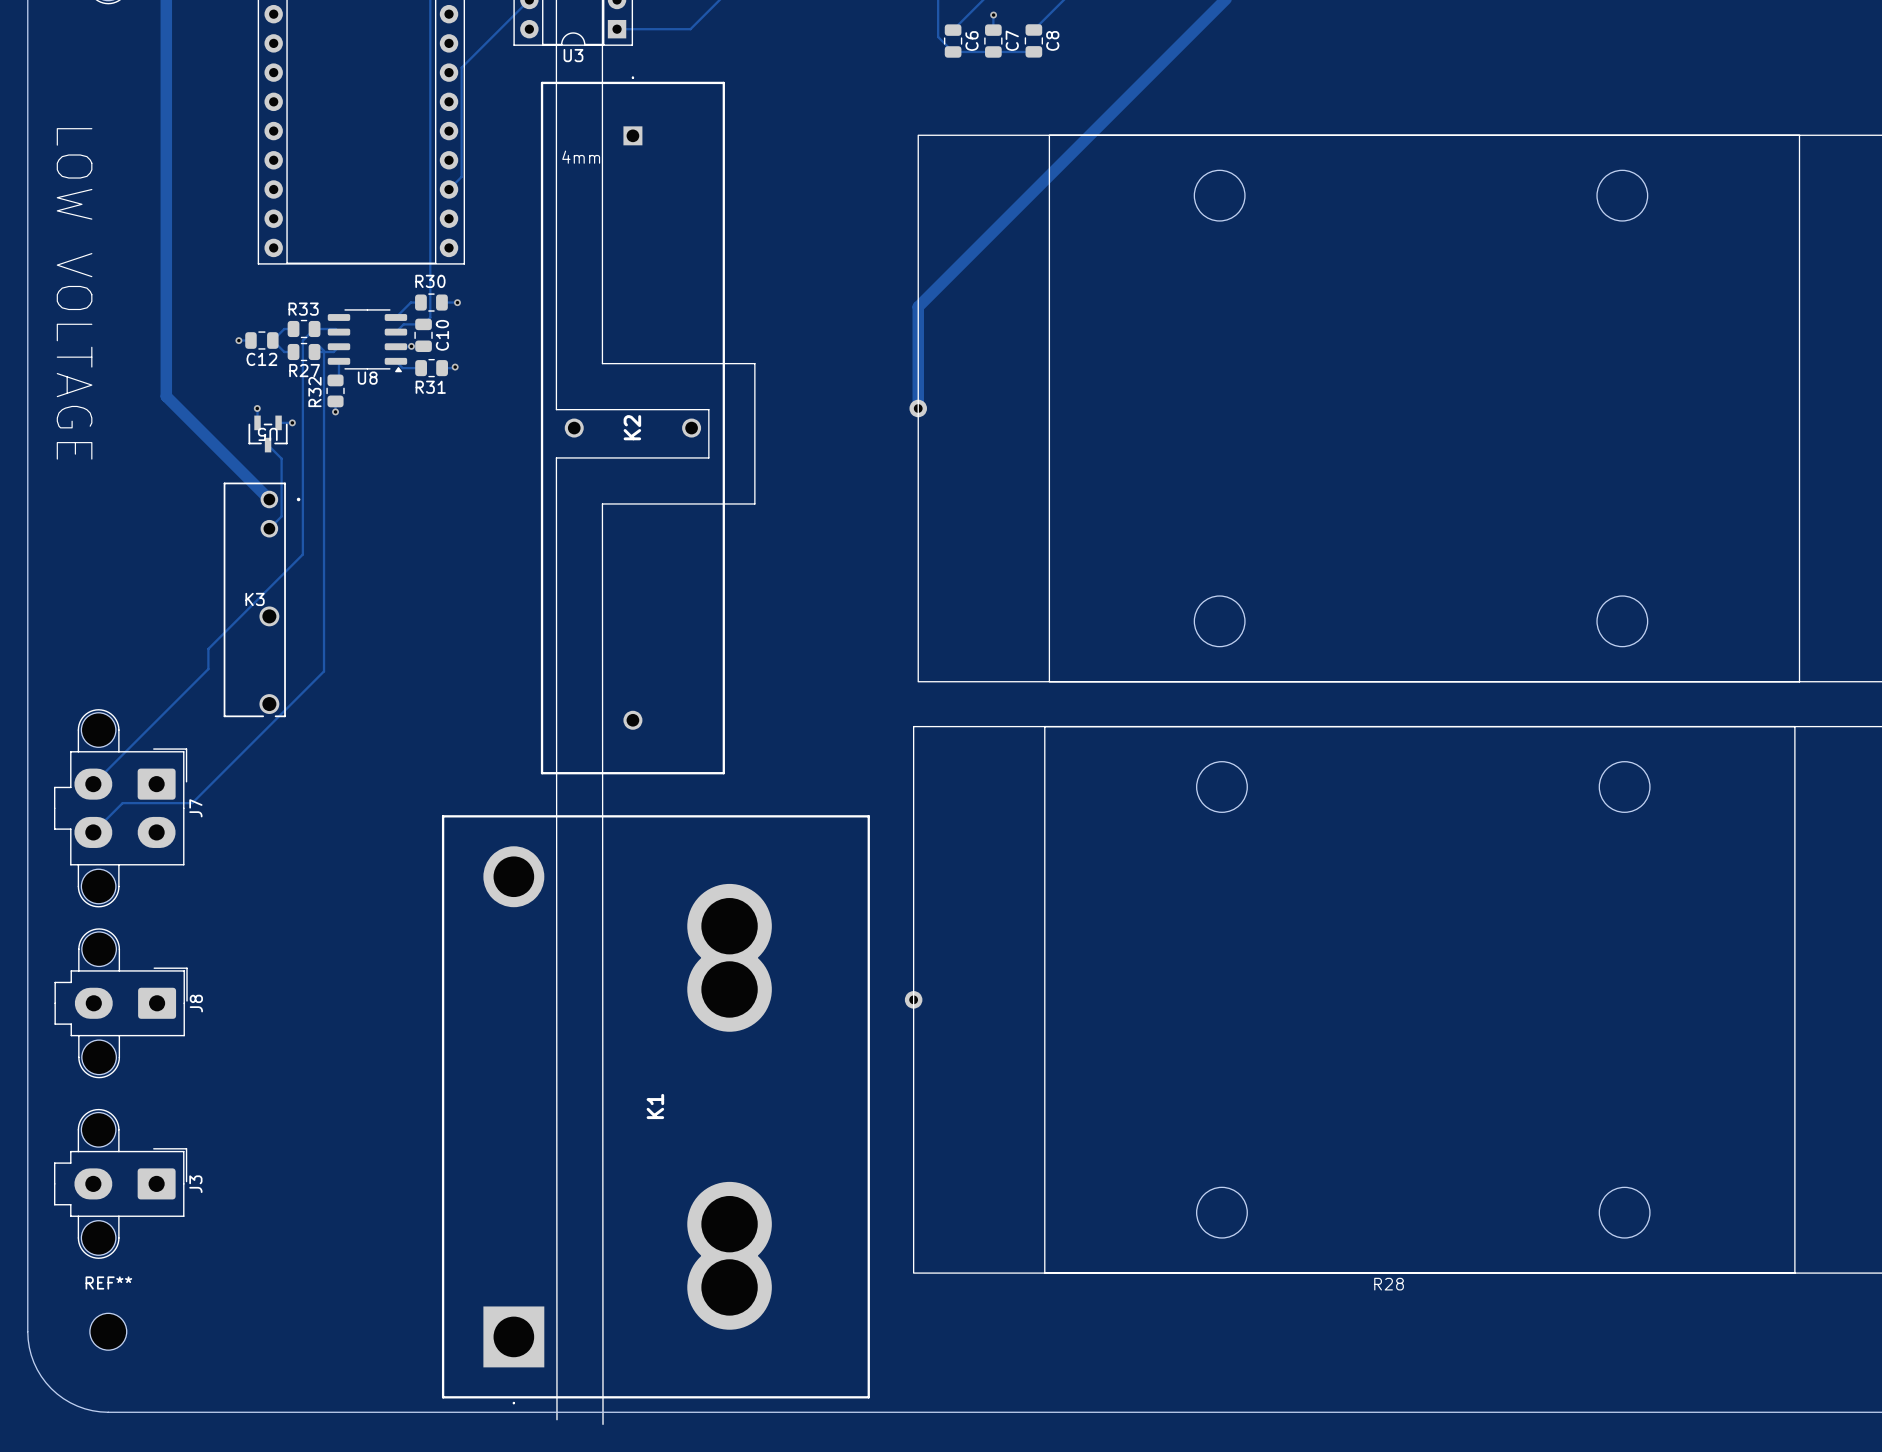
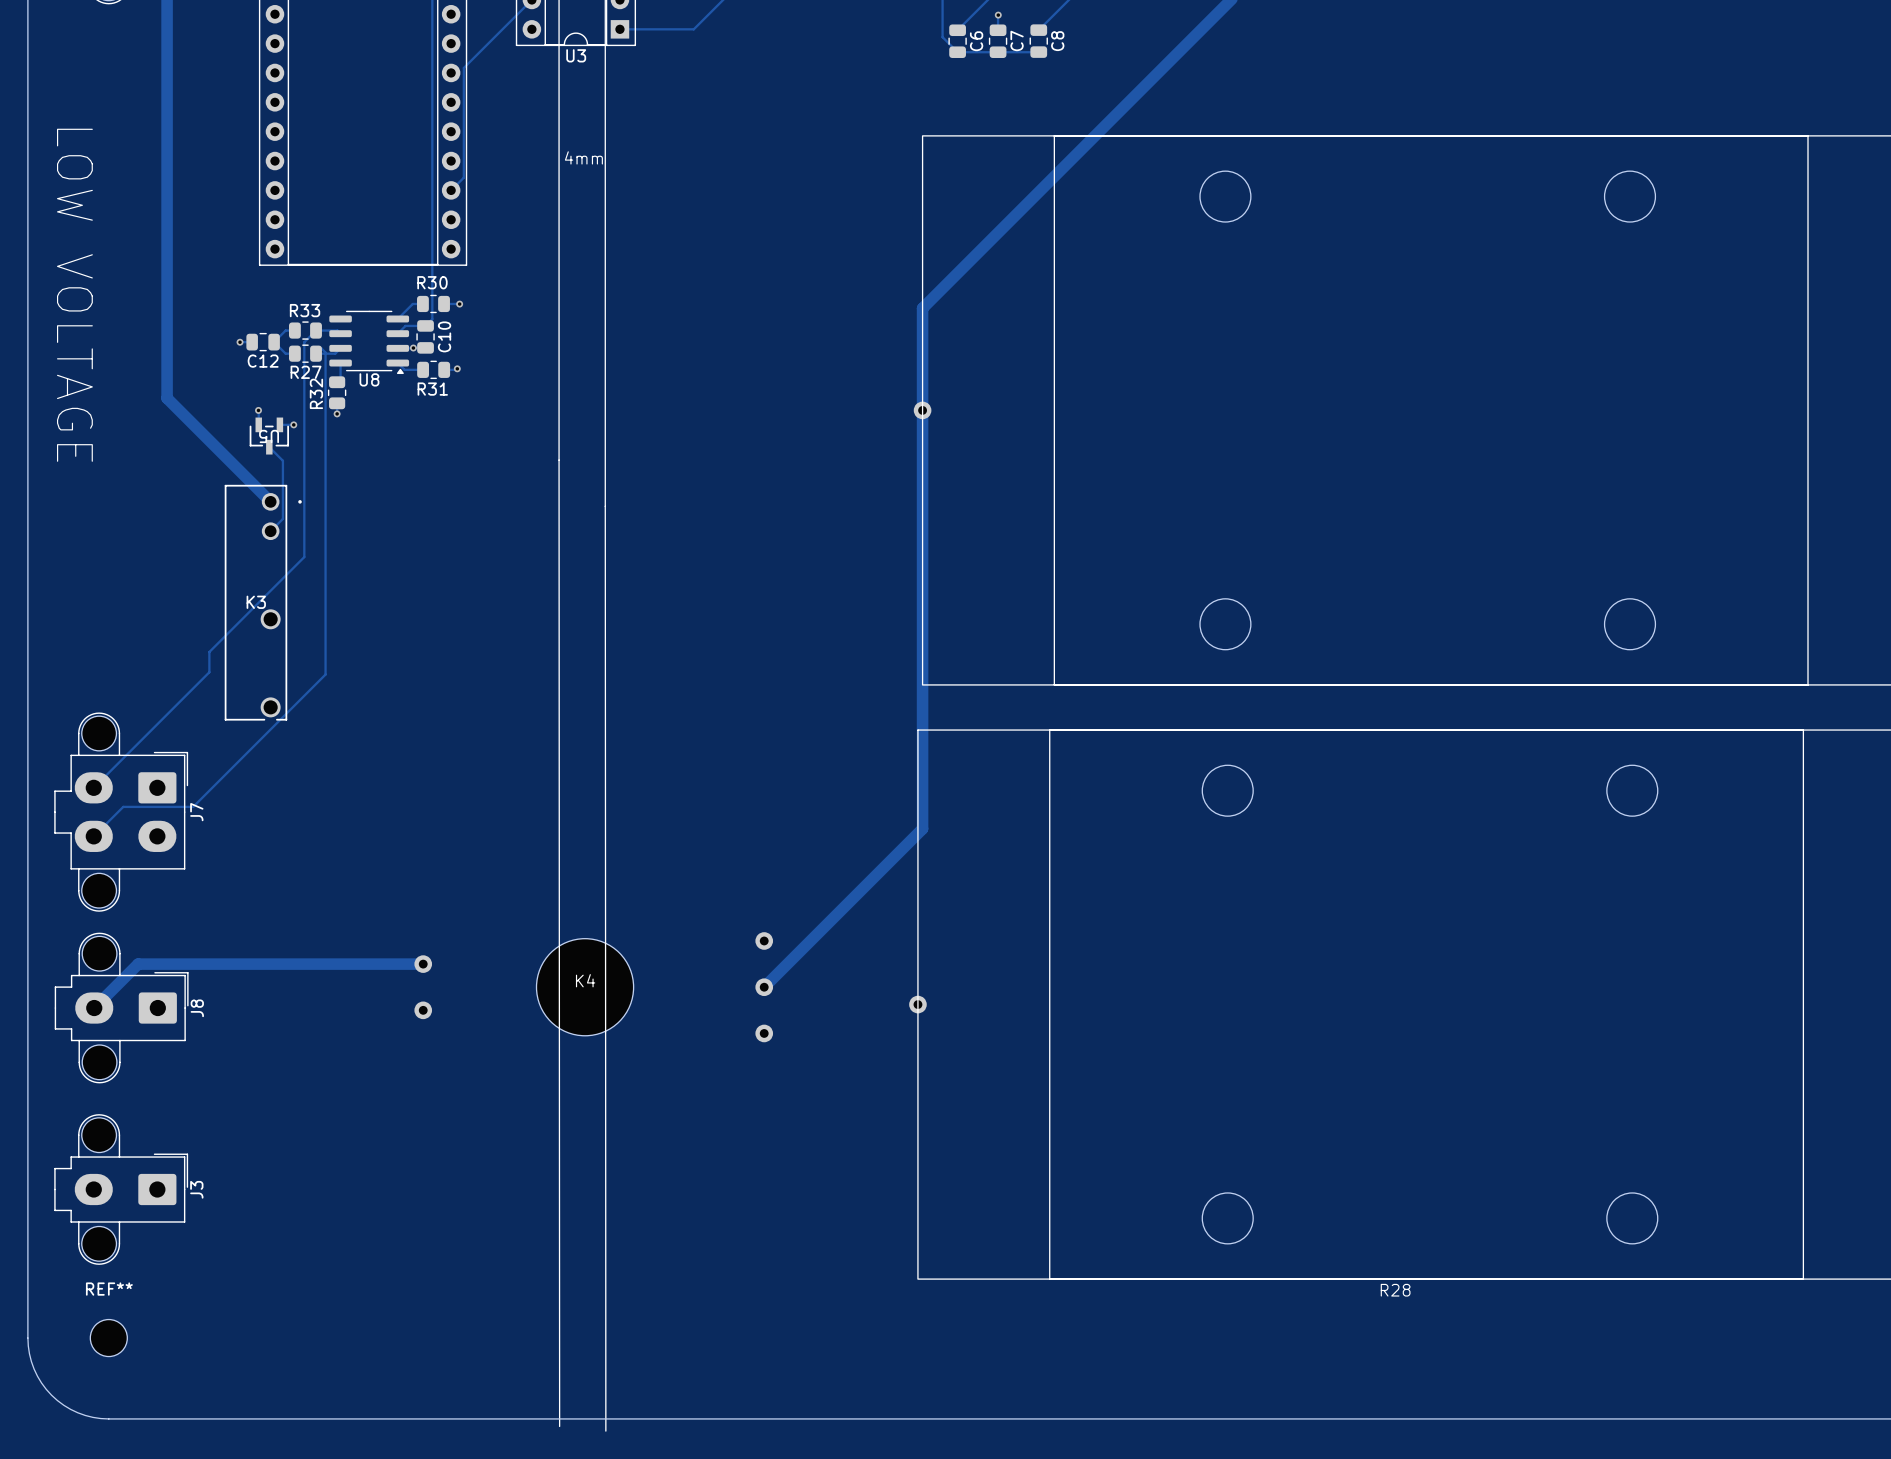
line: (602, 363) (754, 363) (754, 503) (602, 503) -> (605, 365) (605, 506)
track: none -> (922, 410) (922, 828) (764, 987)
line: (556, 409) (708, 409) (708, 457) (556, 457) -> (559, 411) (559, 460)
K2: (632, 425) -> none
track: none -> (423, 964) (138, 964) (94, 1008)
K4: none -> (593, 987)
K1: (655, 1109) -> none

